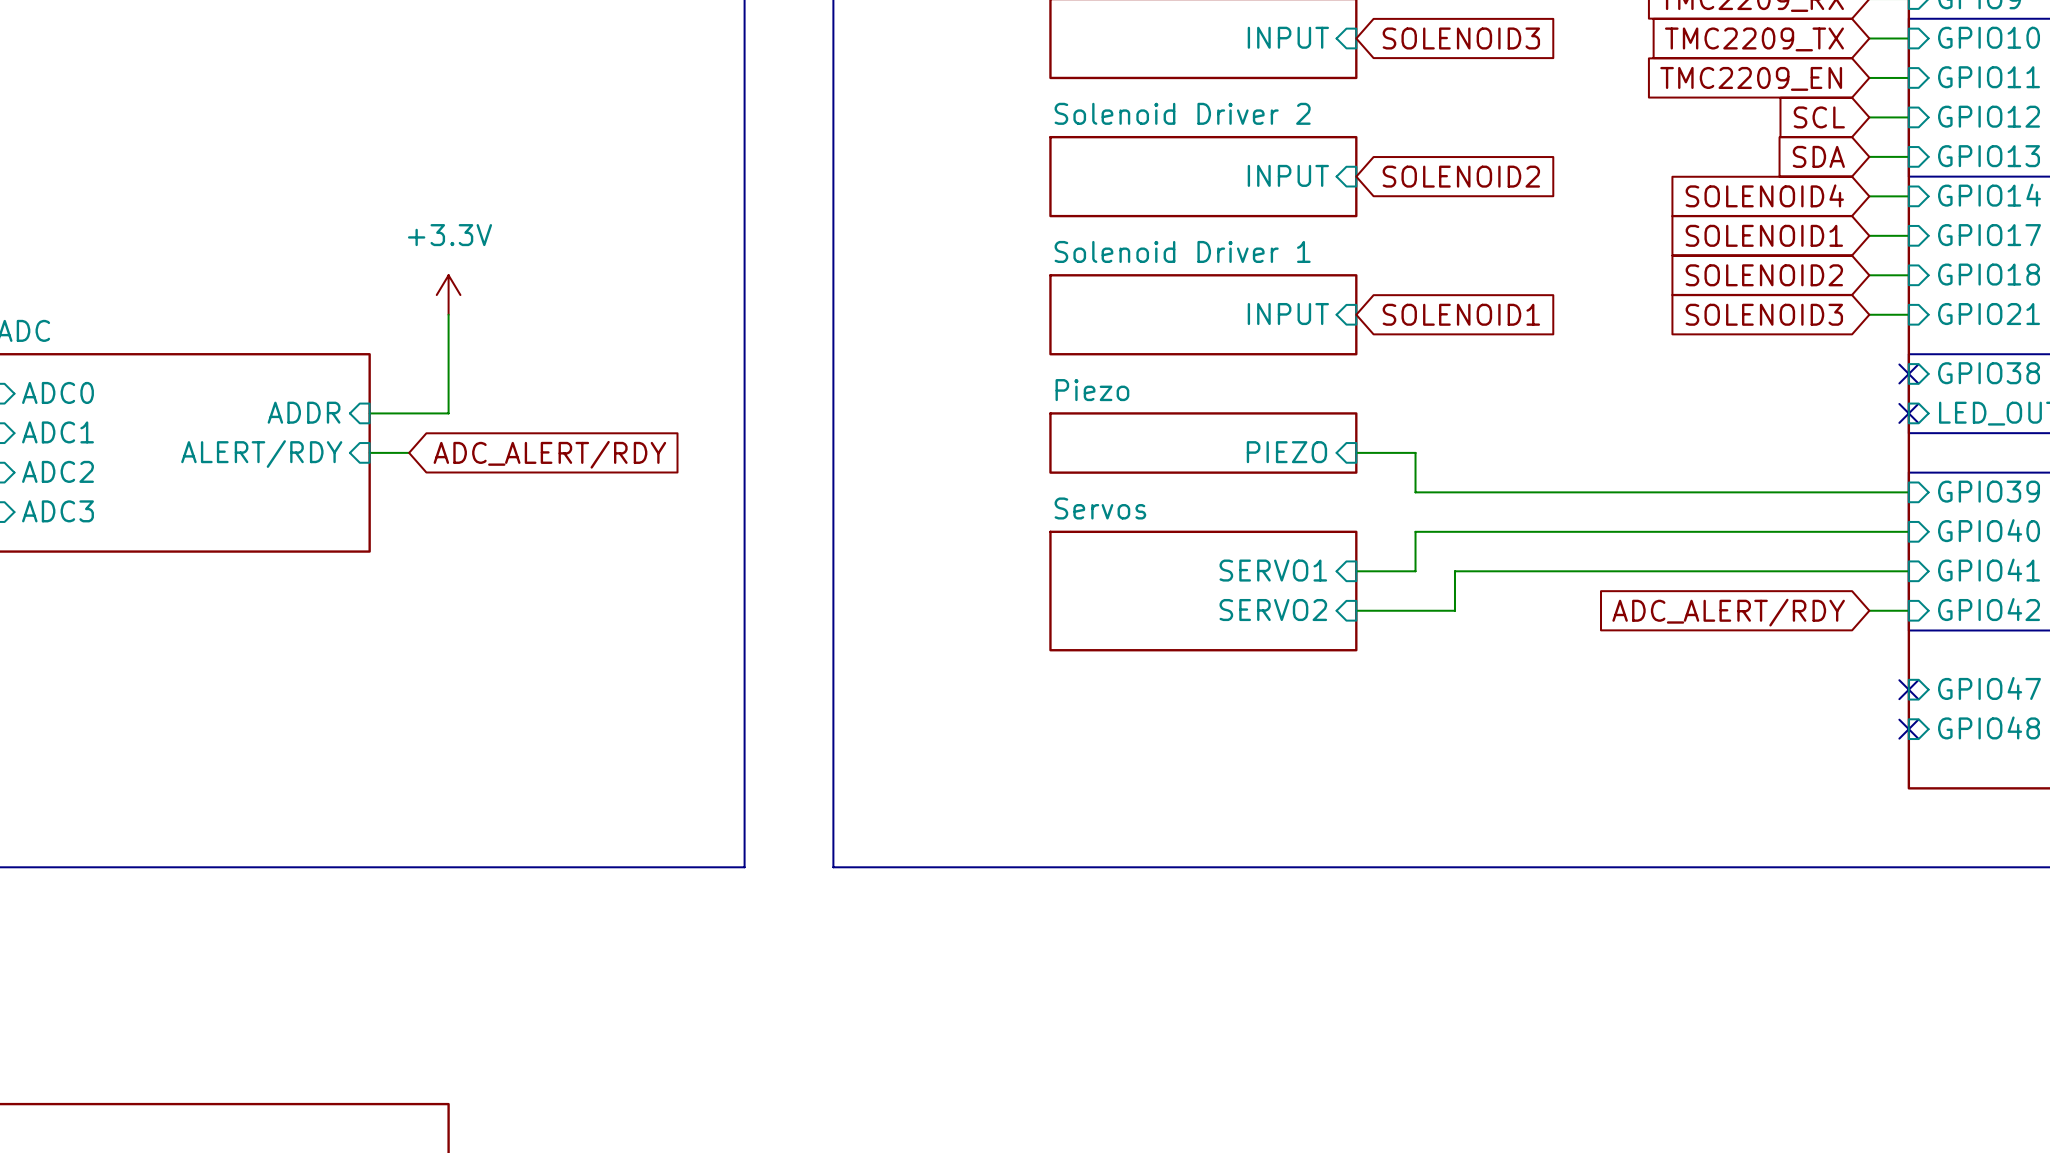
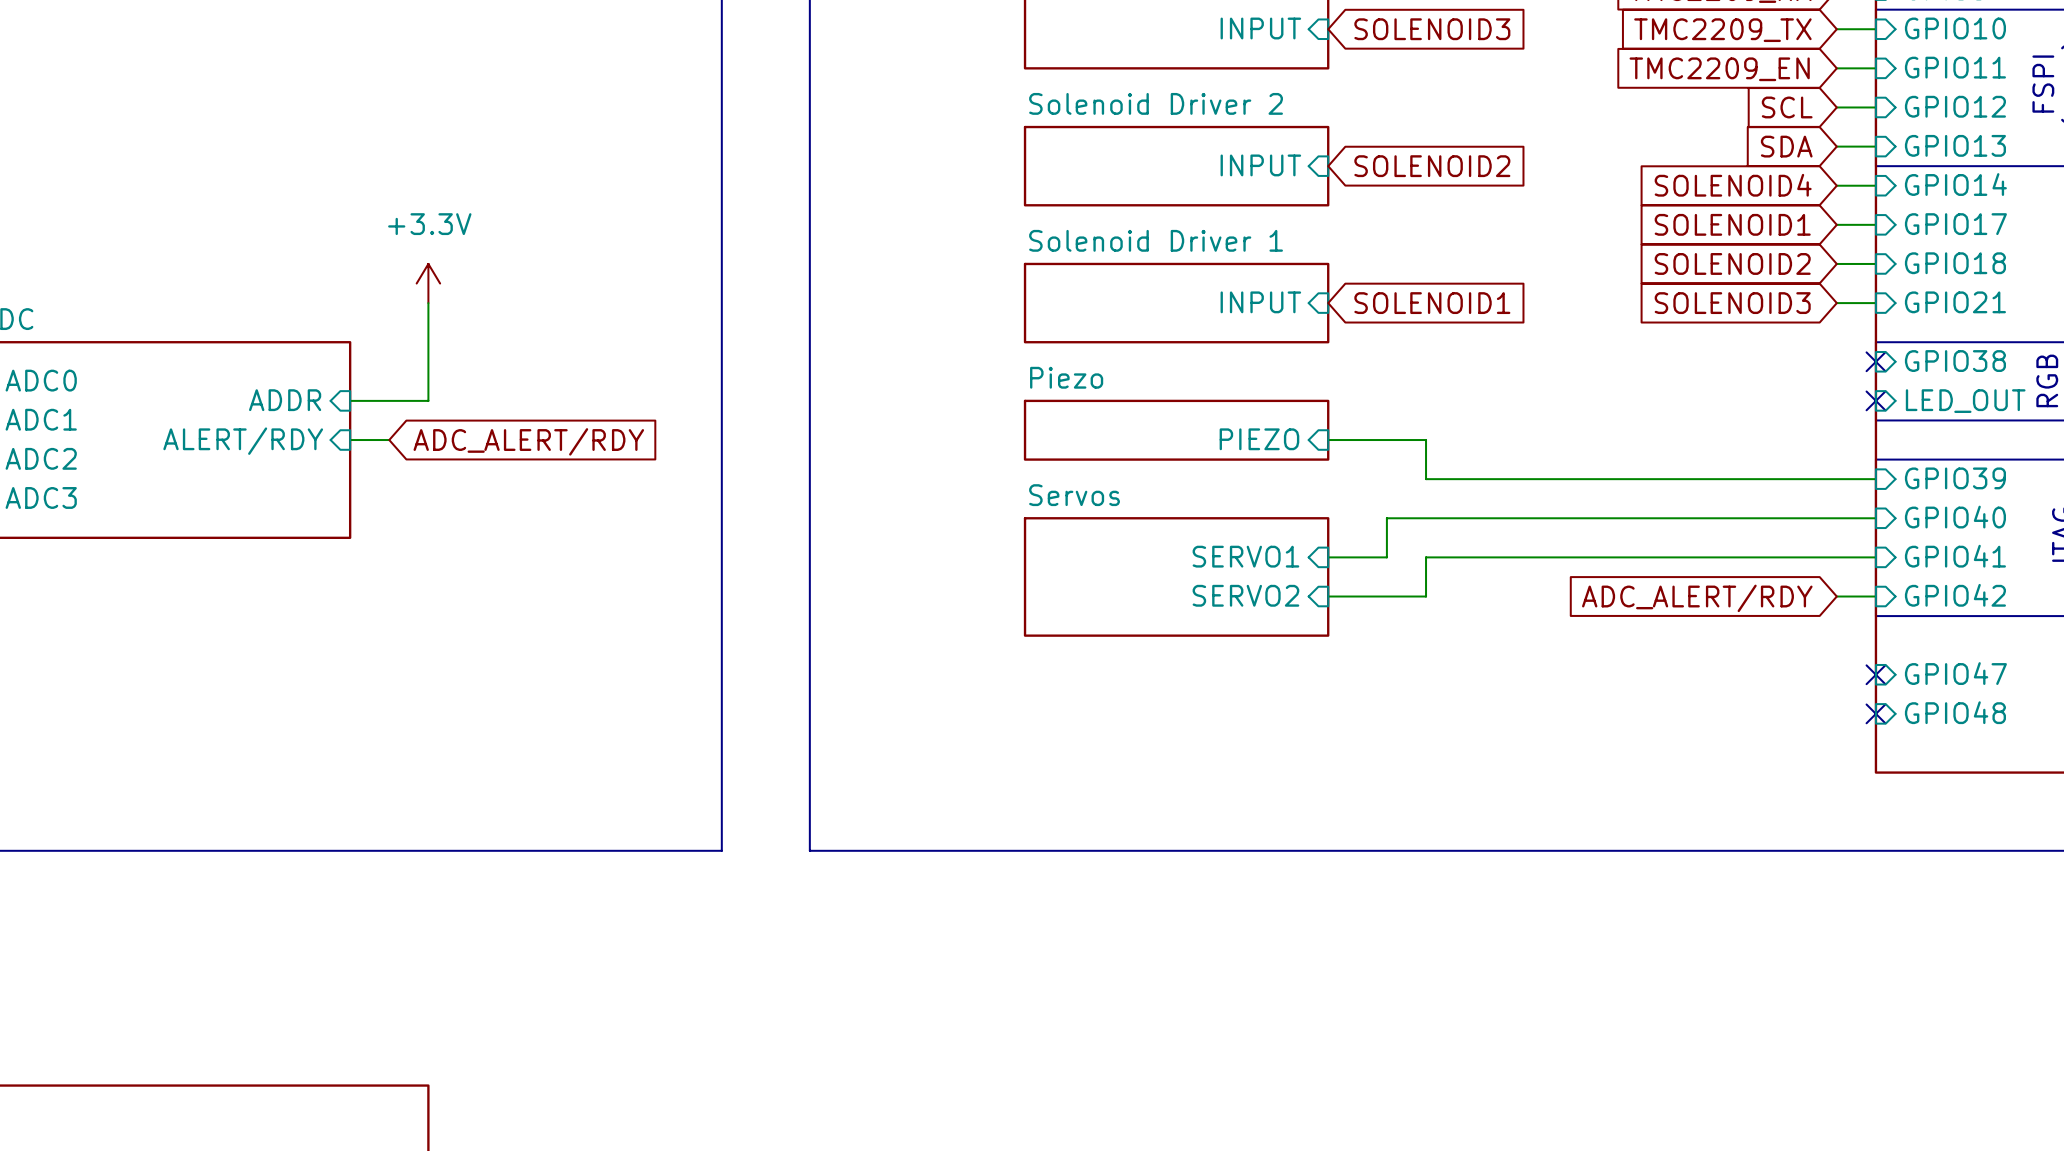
wire: (1415, 452) (1415, 492) (1454, 492) -> (1386, 440) (1426, 440) (1426, 479)

